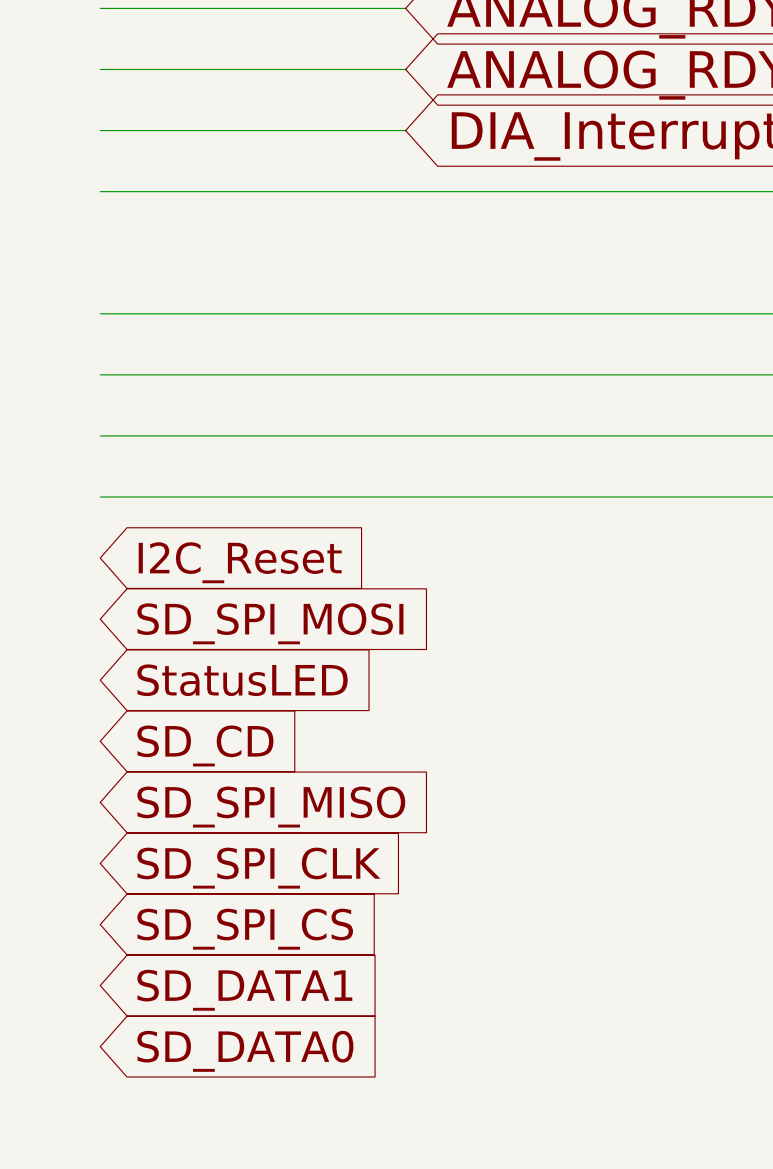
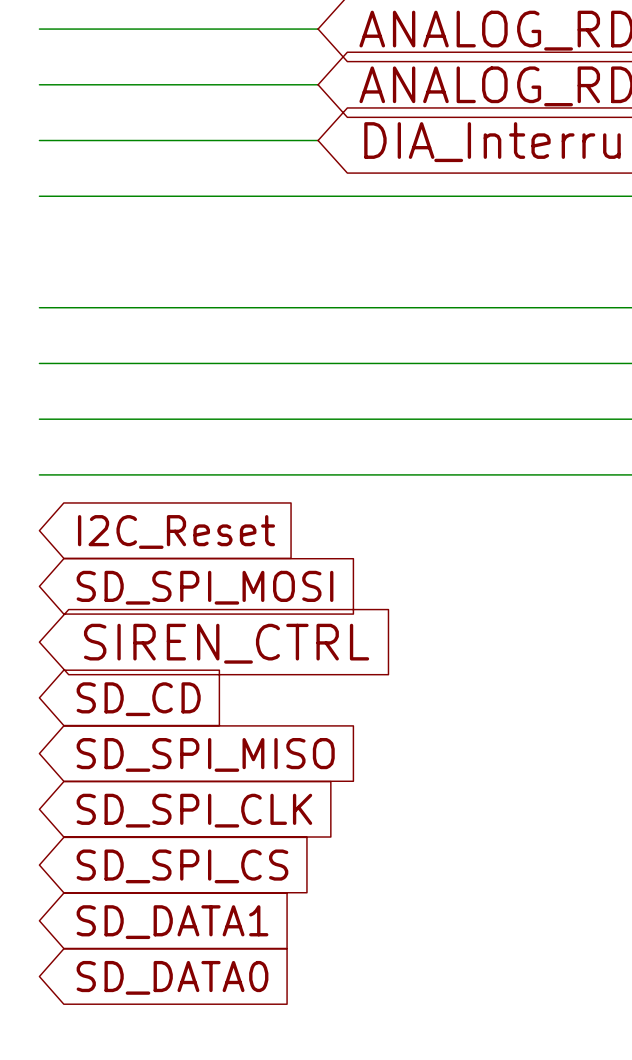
global label: StatusLED (242, 680) -> SIREN_CTRL (226, 643)

